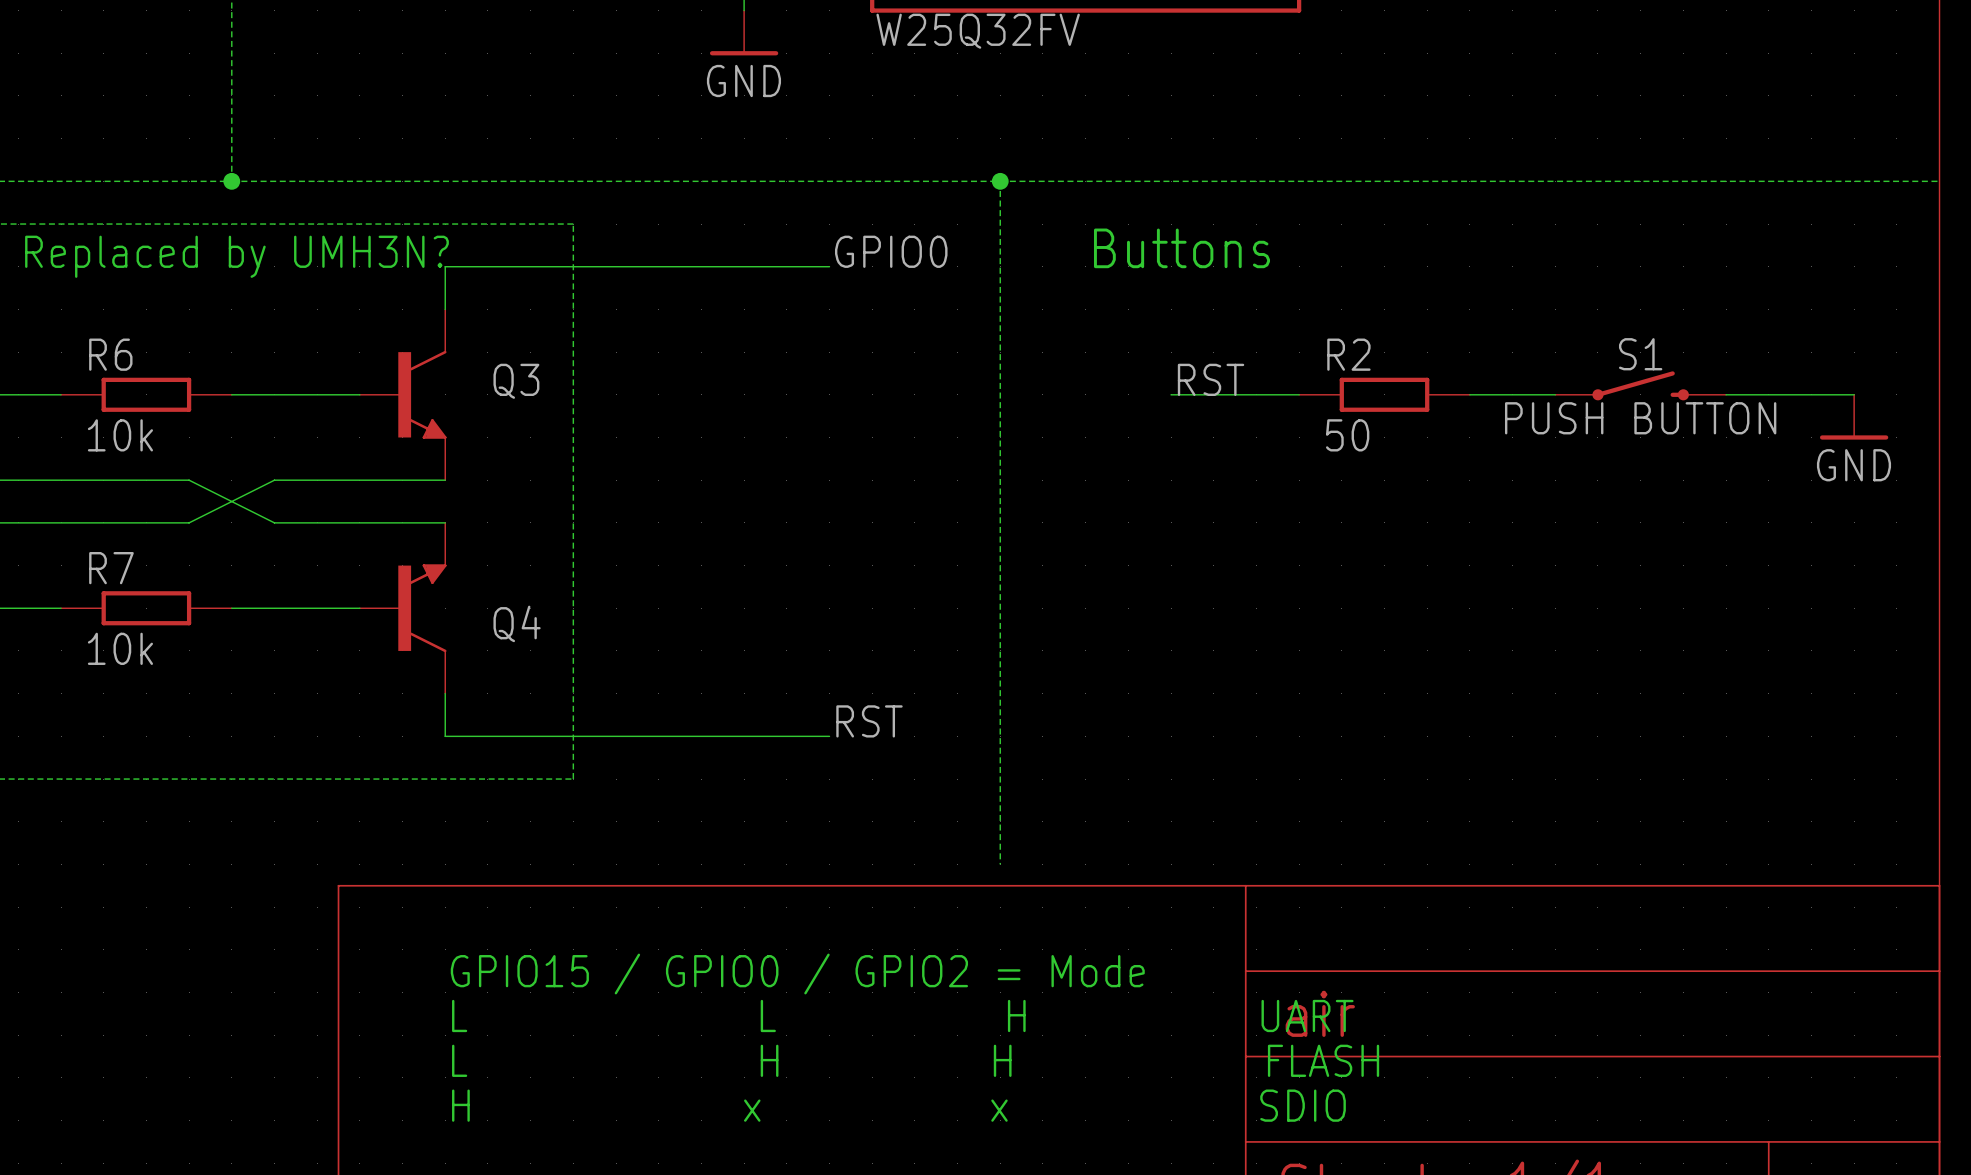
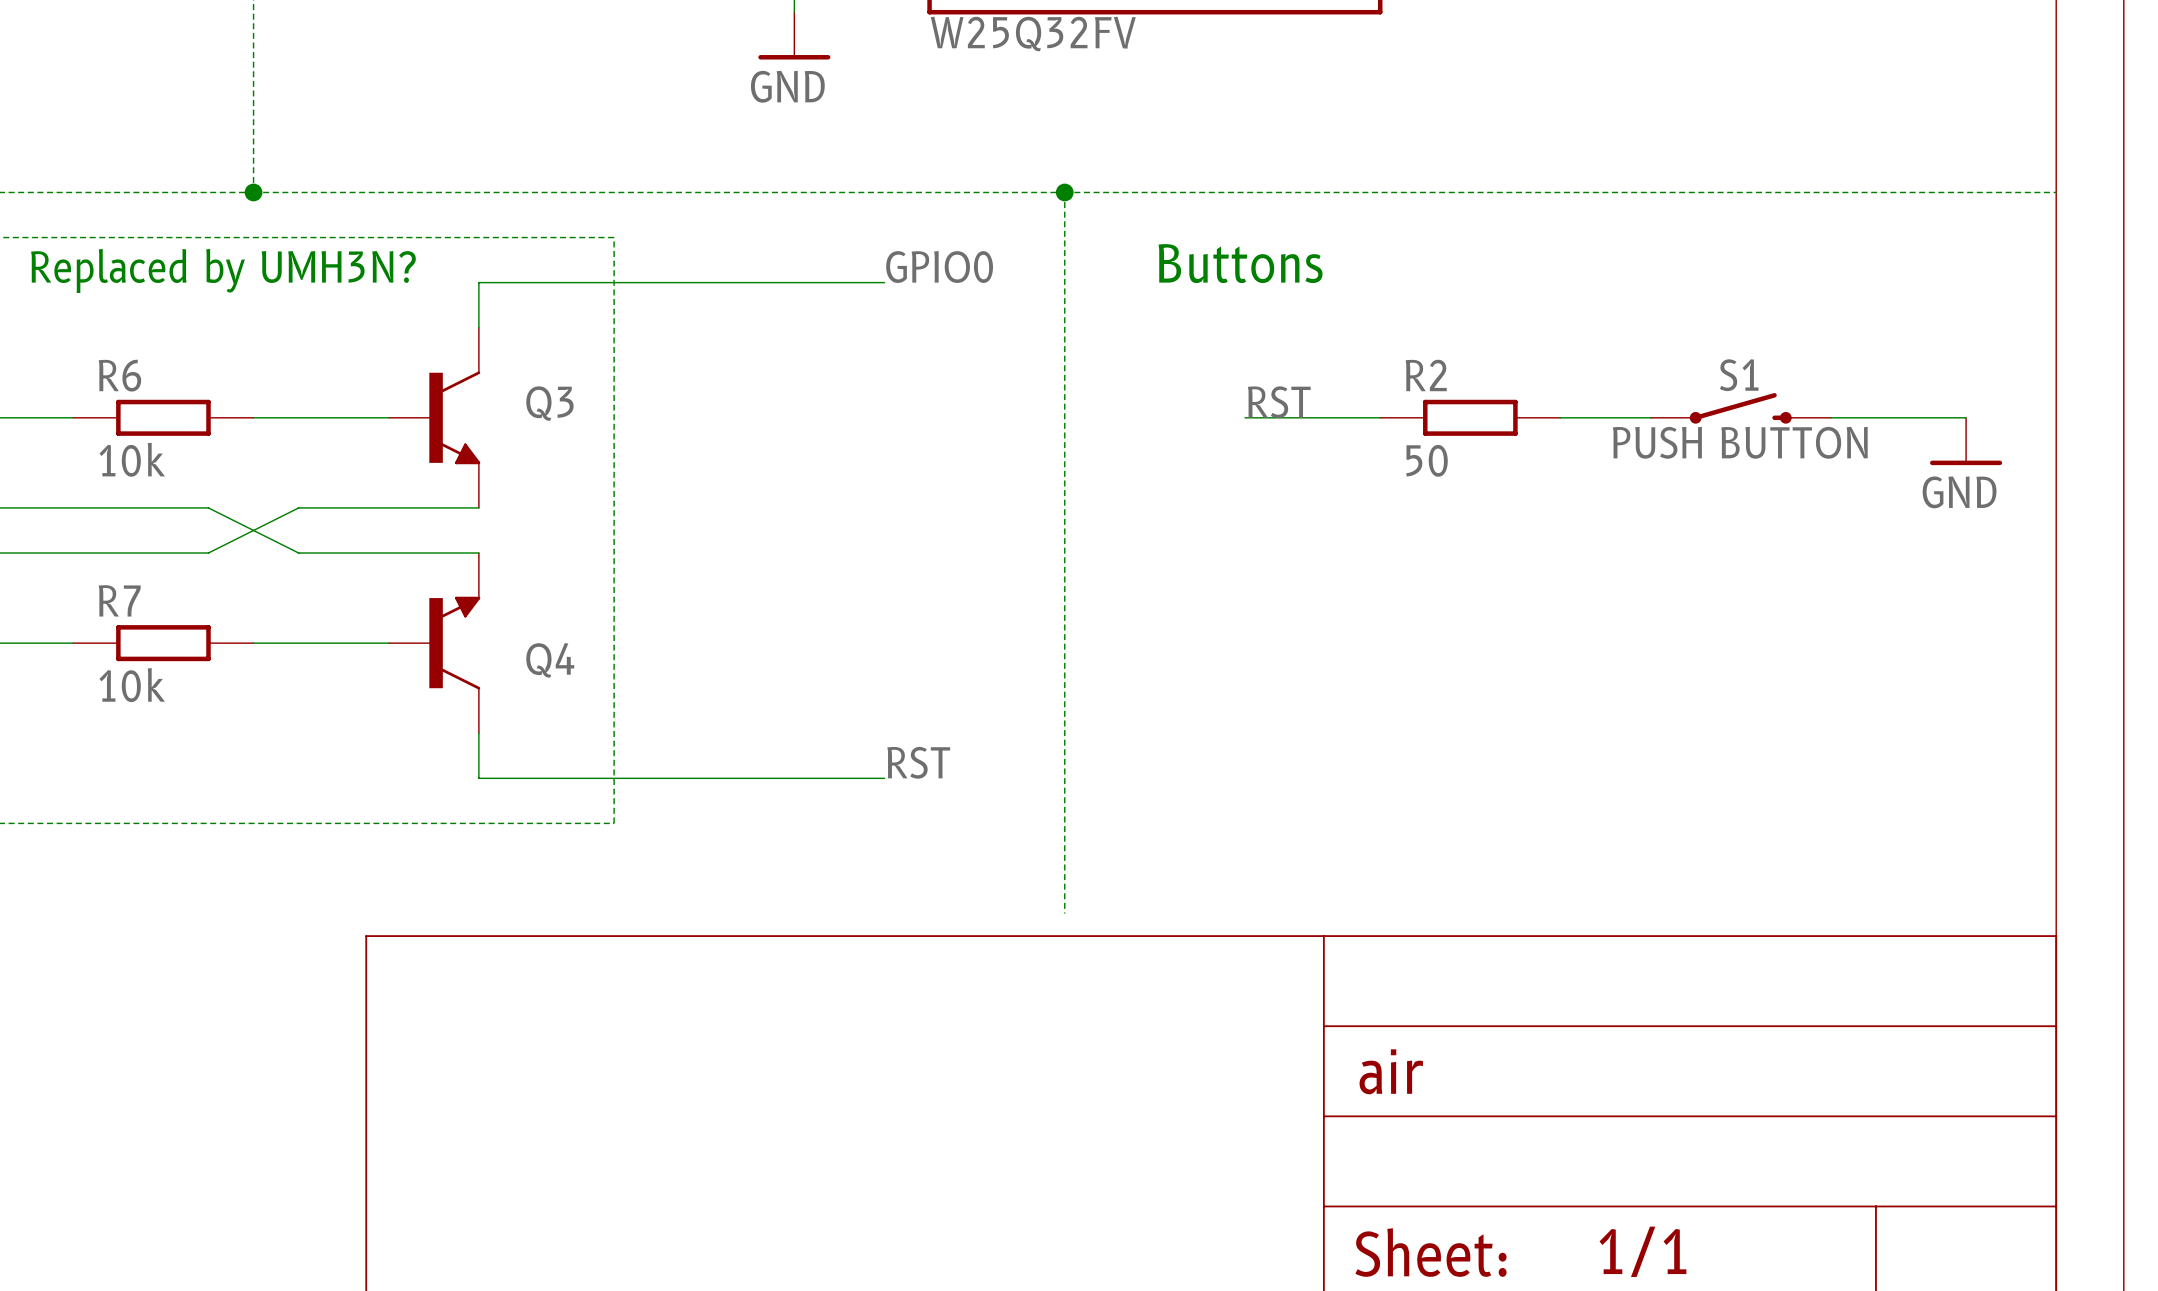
text: GPIO15 / GPIO0 / GPIO2 = Mode (797, 974) -> none
text: L L H UART (902, 1015) -> none
text: L H H FLASH (915, 1060) -> none
text: H x x SDIO (898, 1105) -> none

